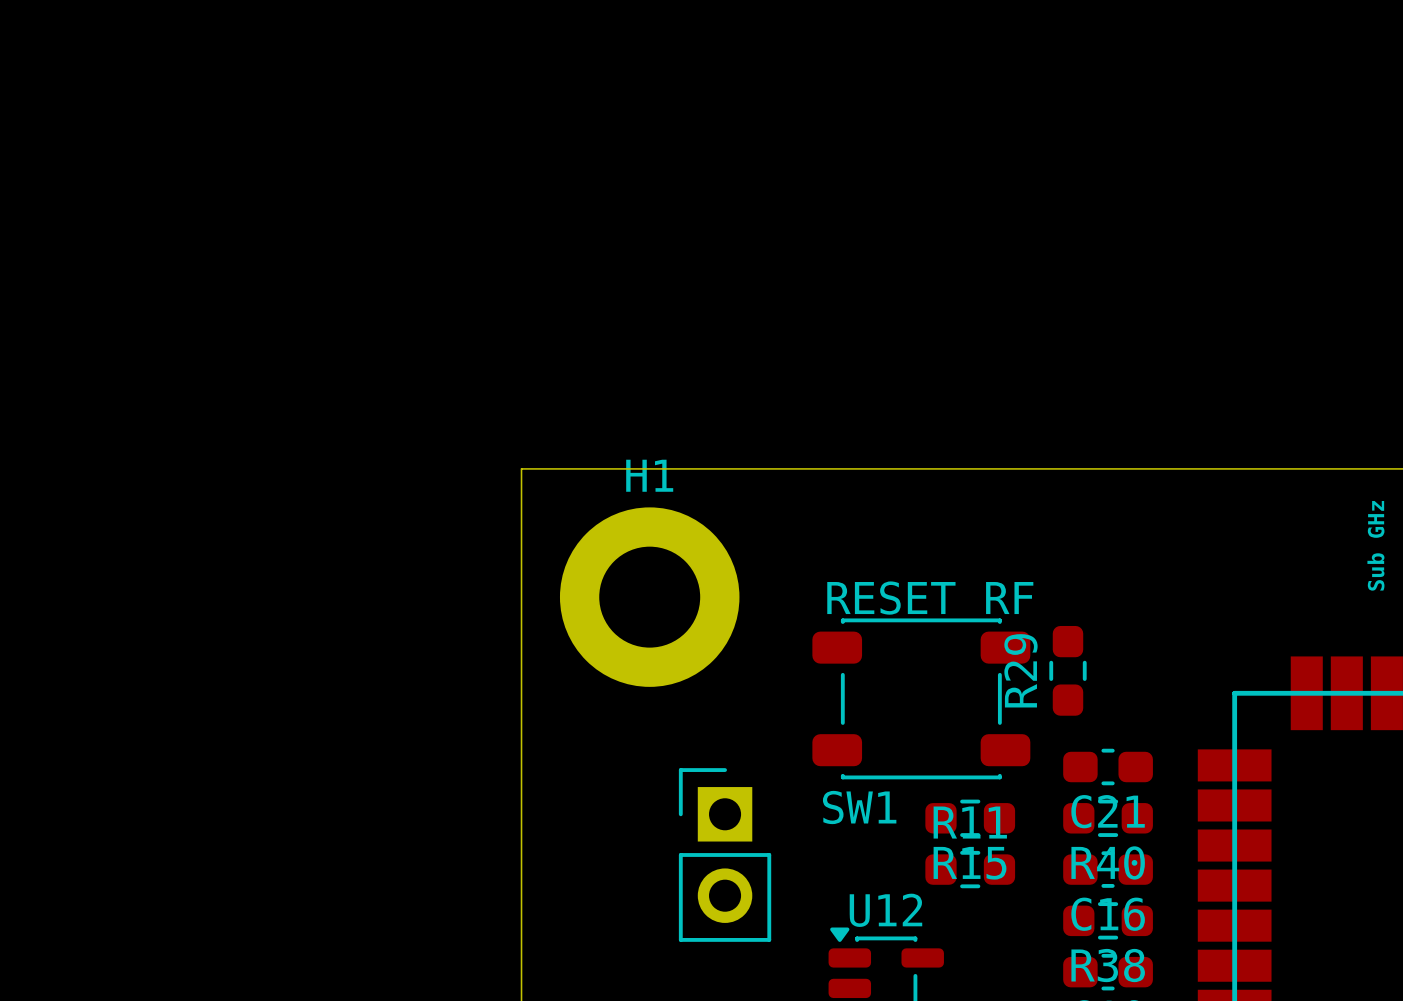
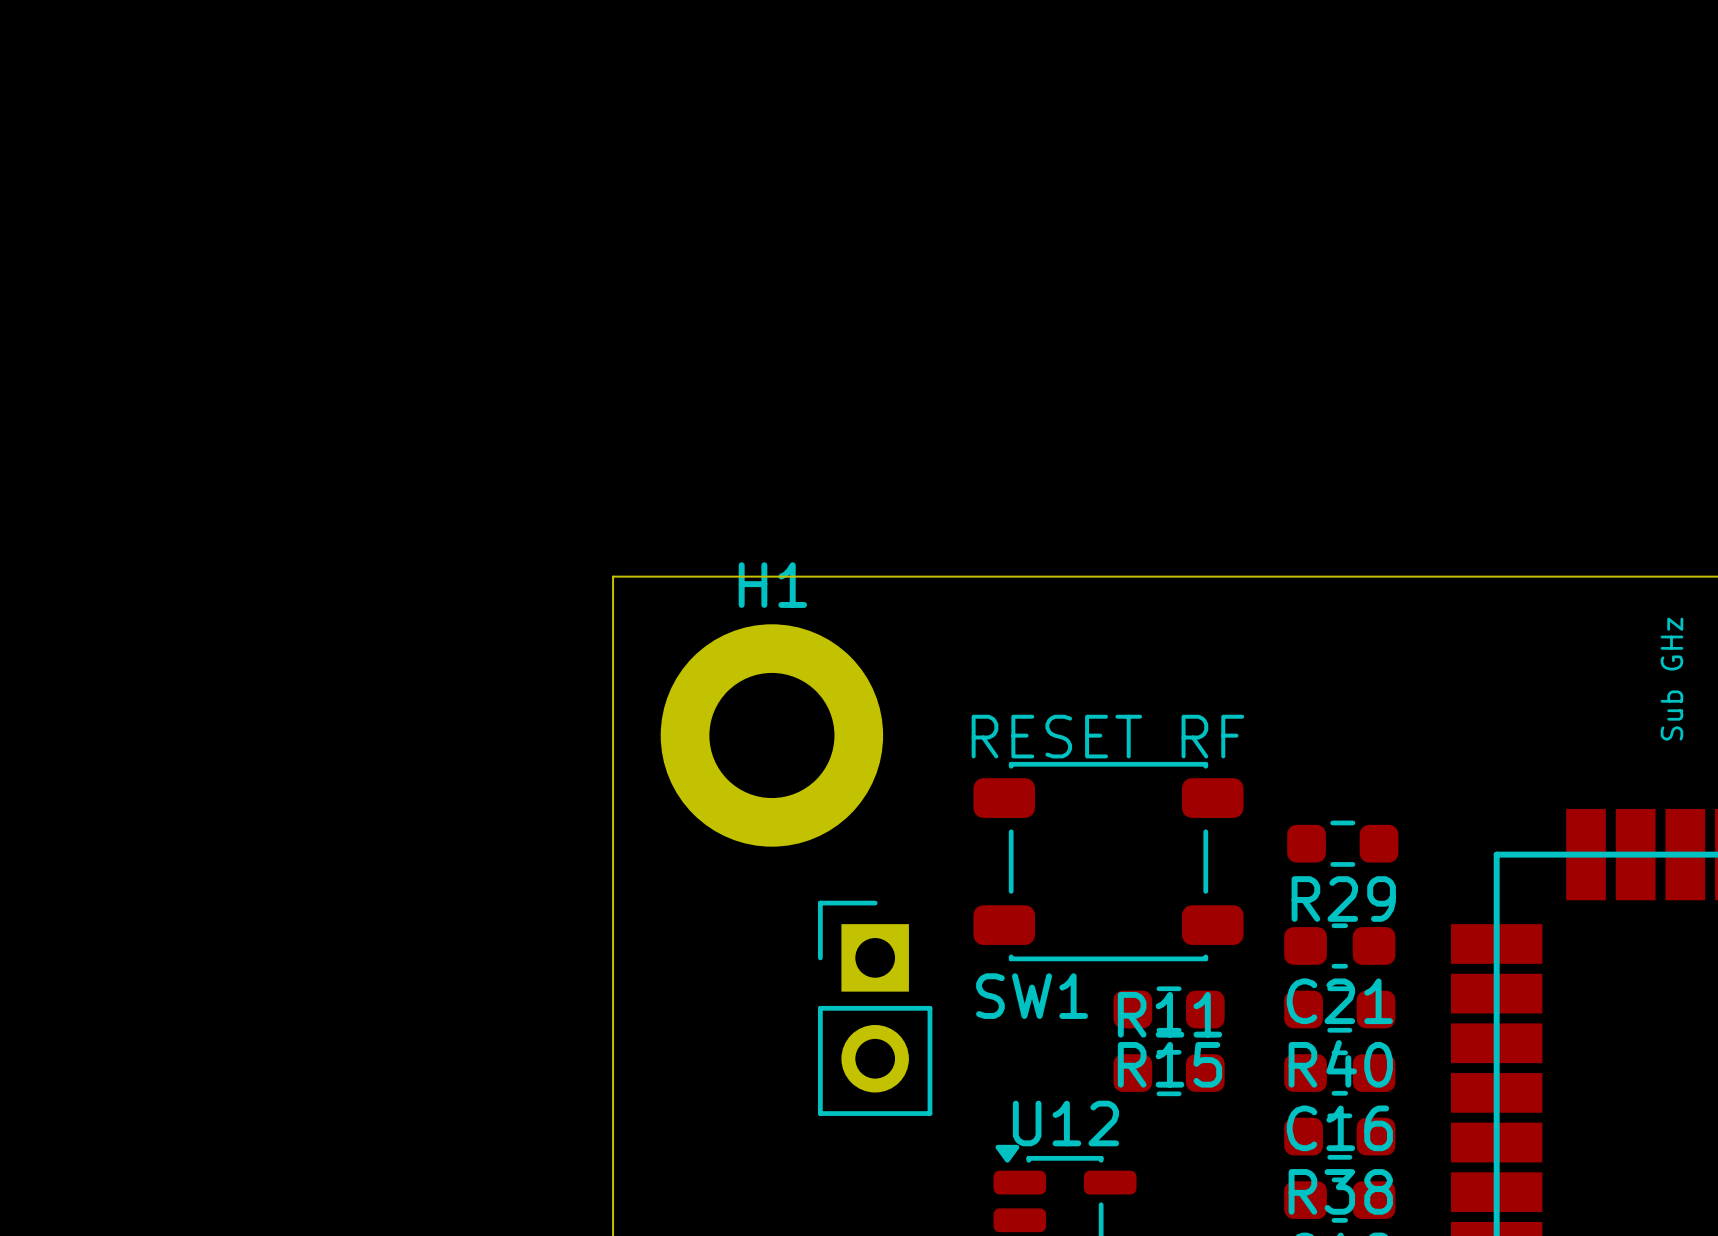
R29 name position: R29 (1020, 670) -> R29 (1343, 899)
R29 rotation: 0° (1067, 670) -> 90° clockwise (1342, 843)
part position: (725, 854) -> (875, 1008)

